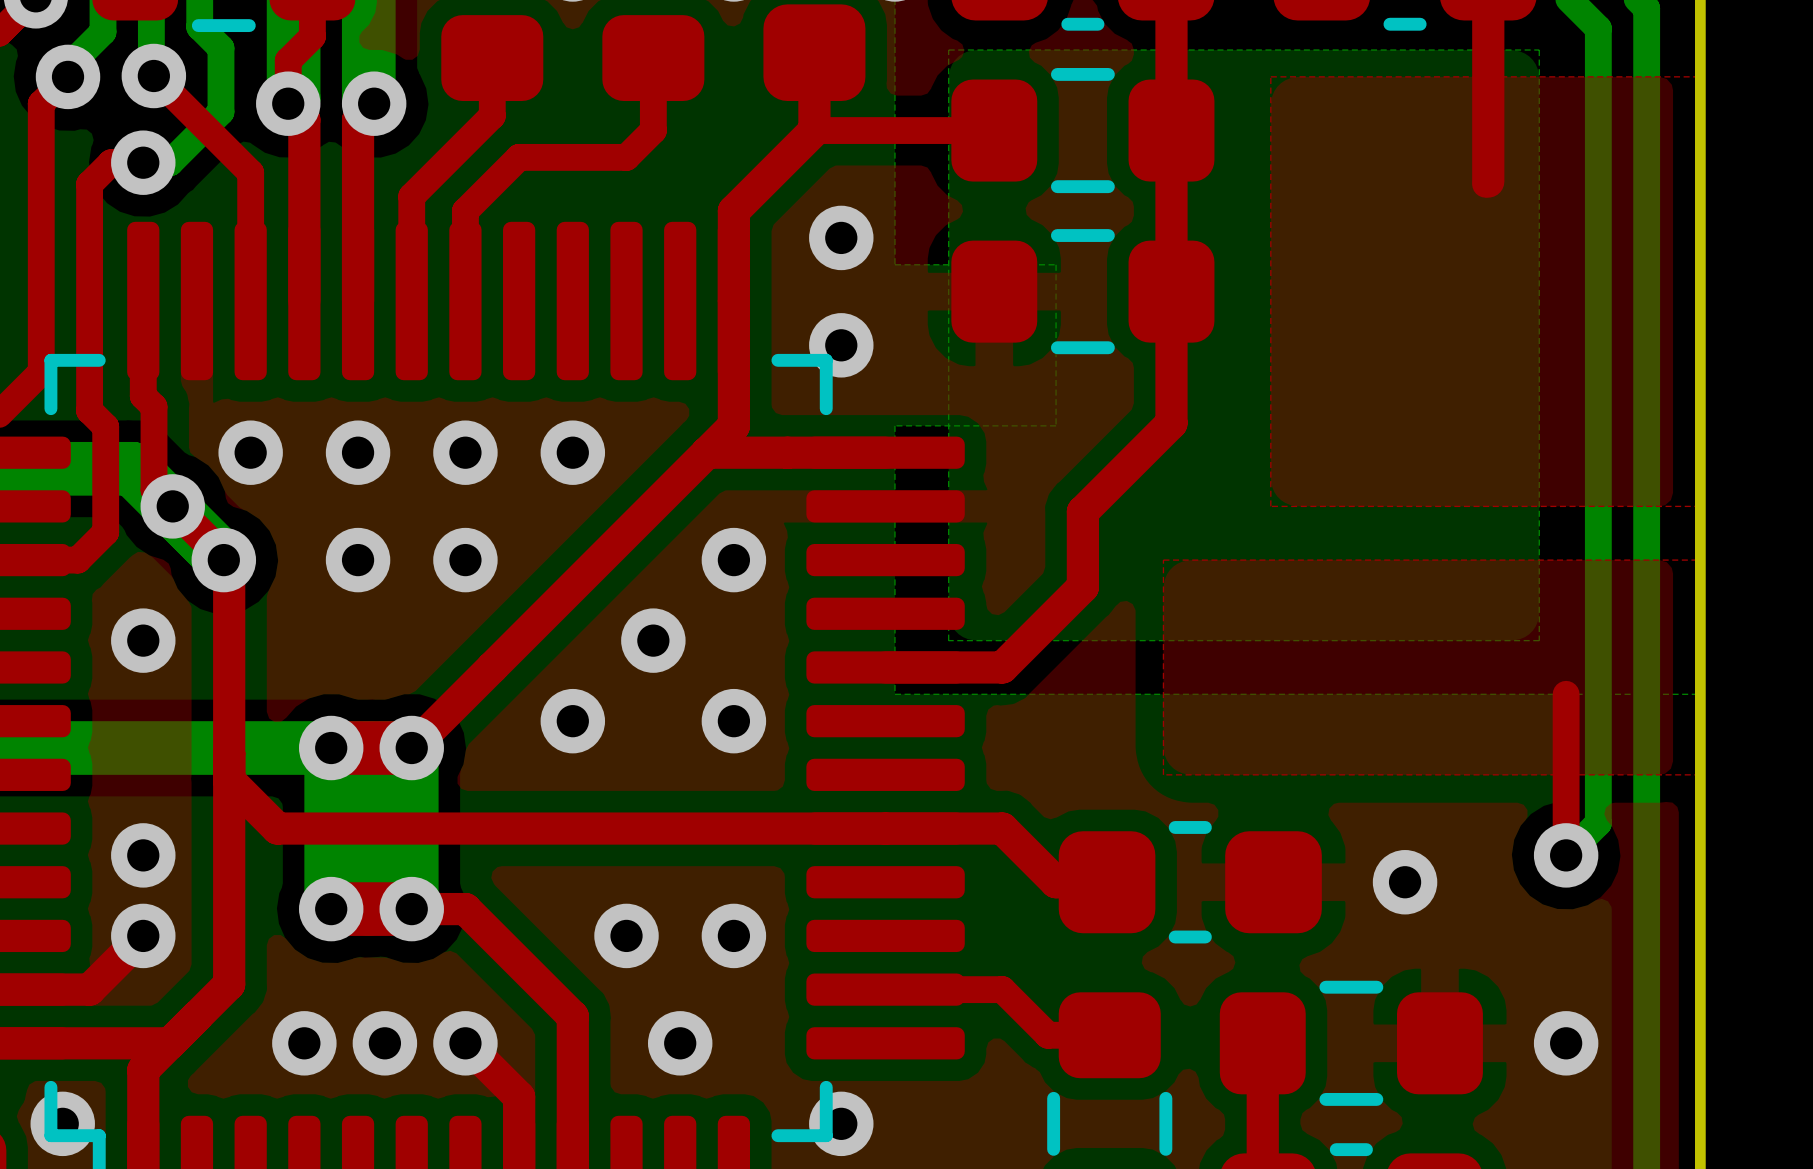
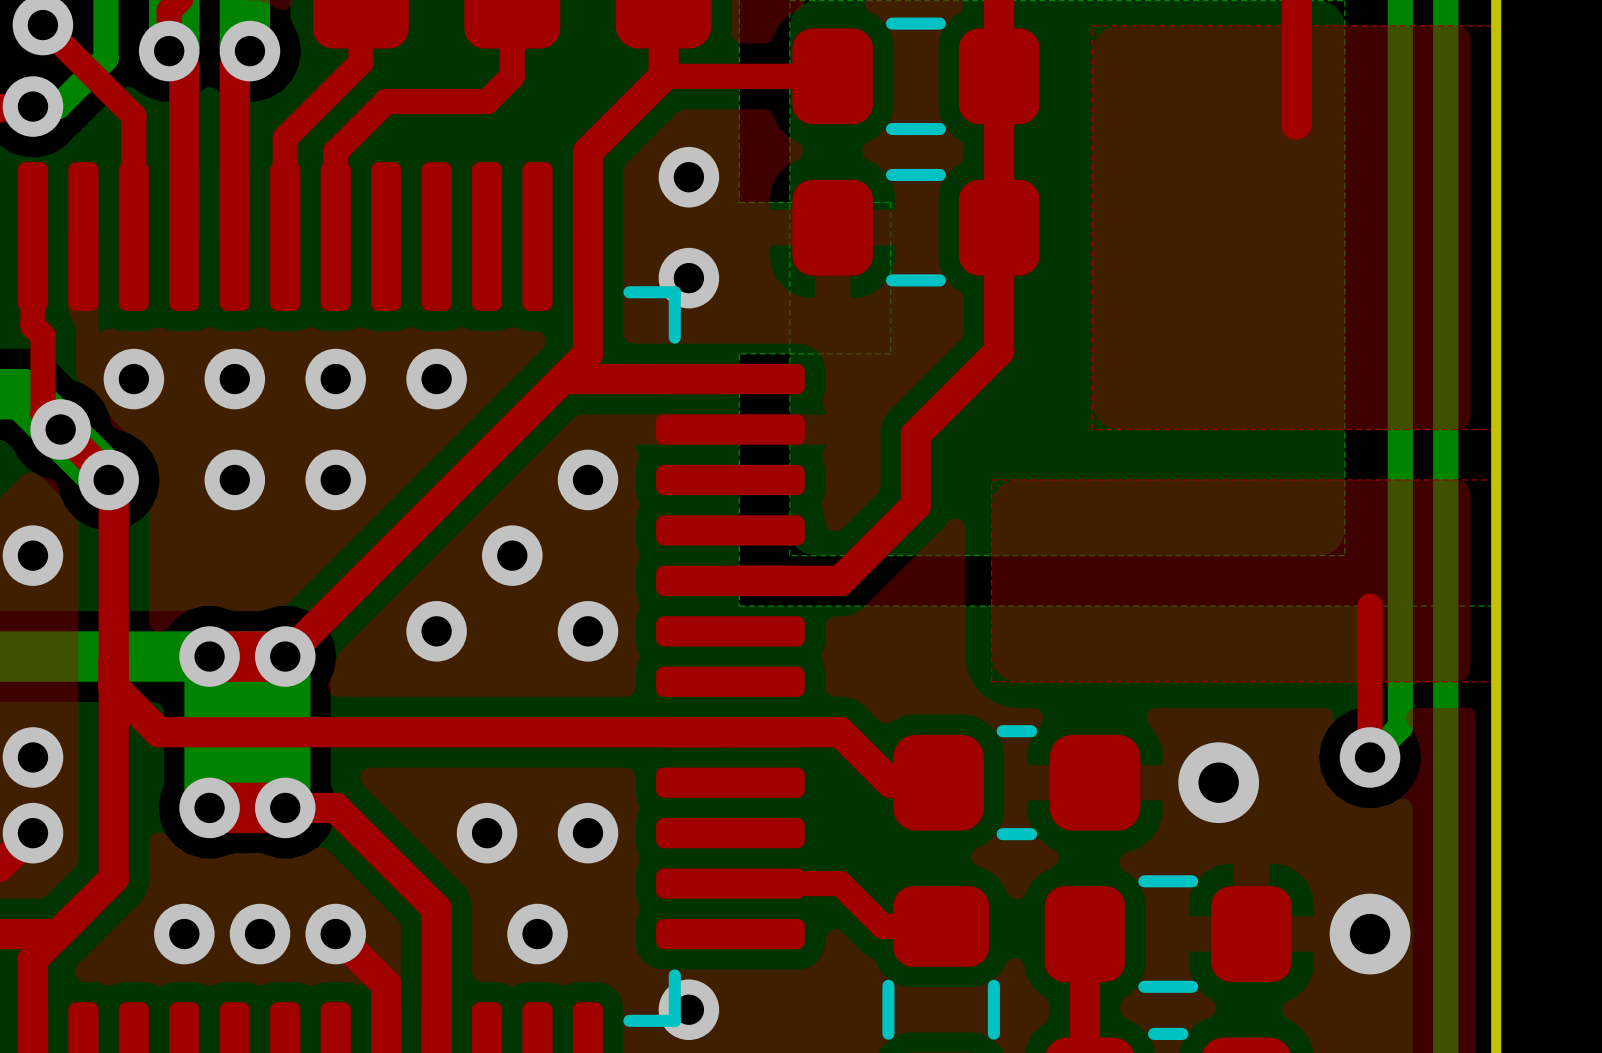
via size: [1372, 850, 1438, 915] -> [1178, 742, 1260, 824]
via size: [1533, 1011, 1599, 1076] -> [1329, 893, 1411, 975]

